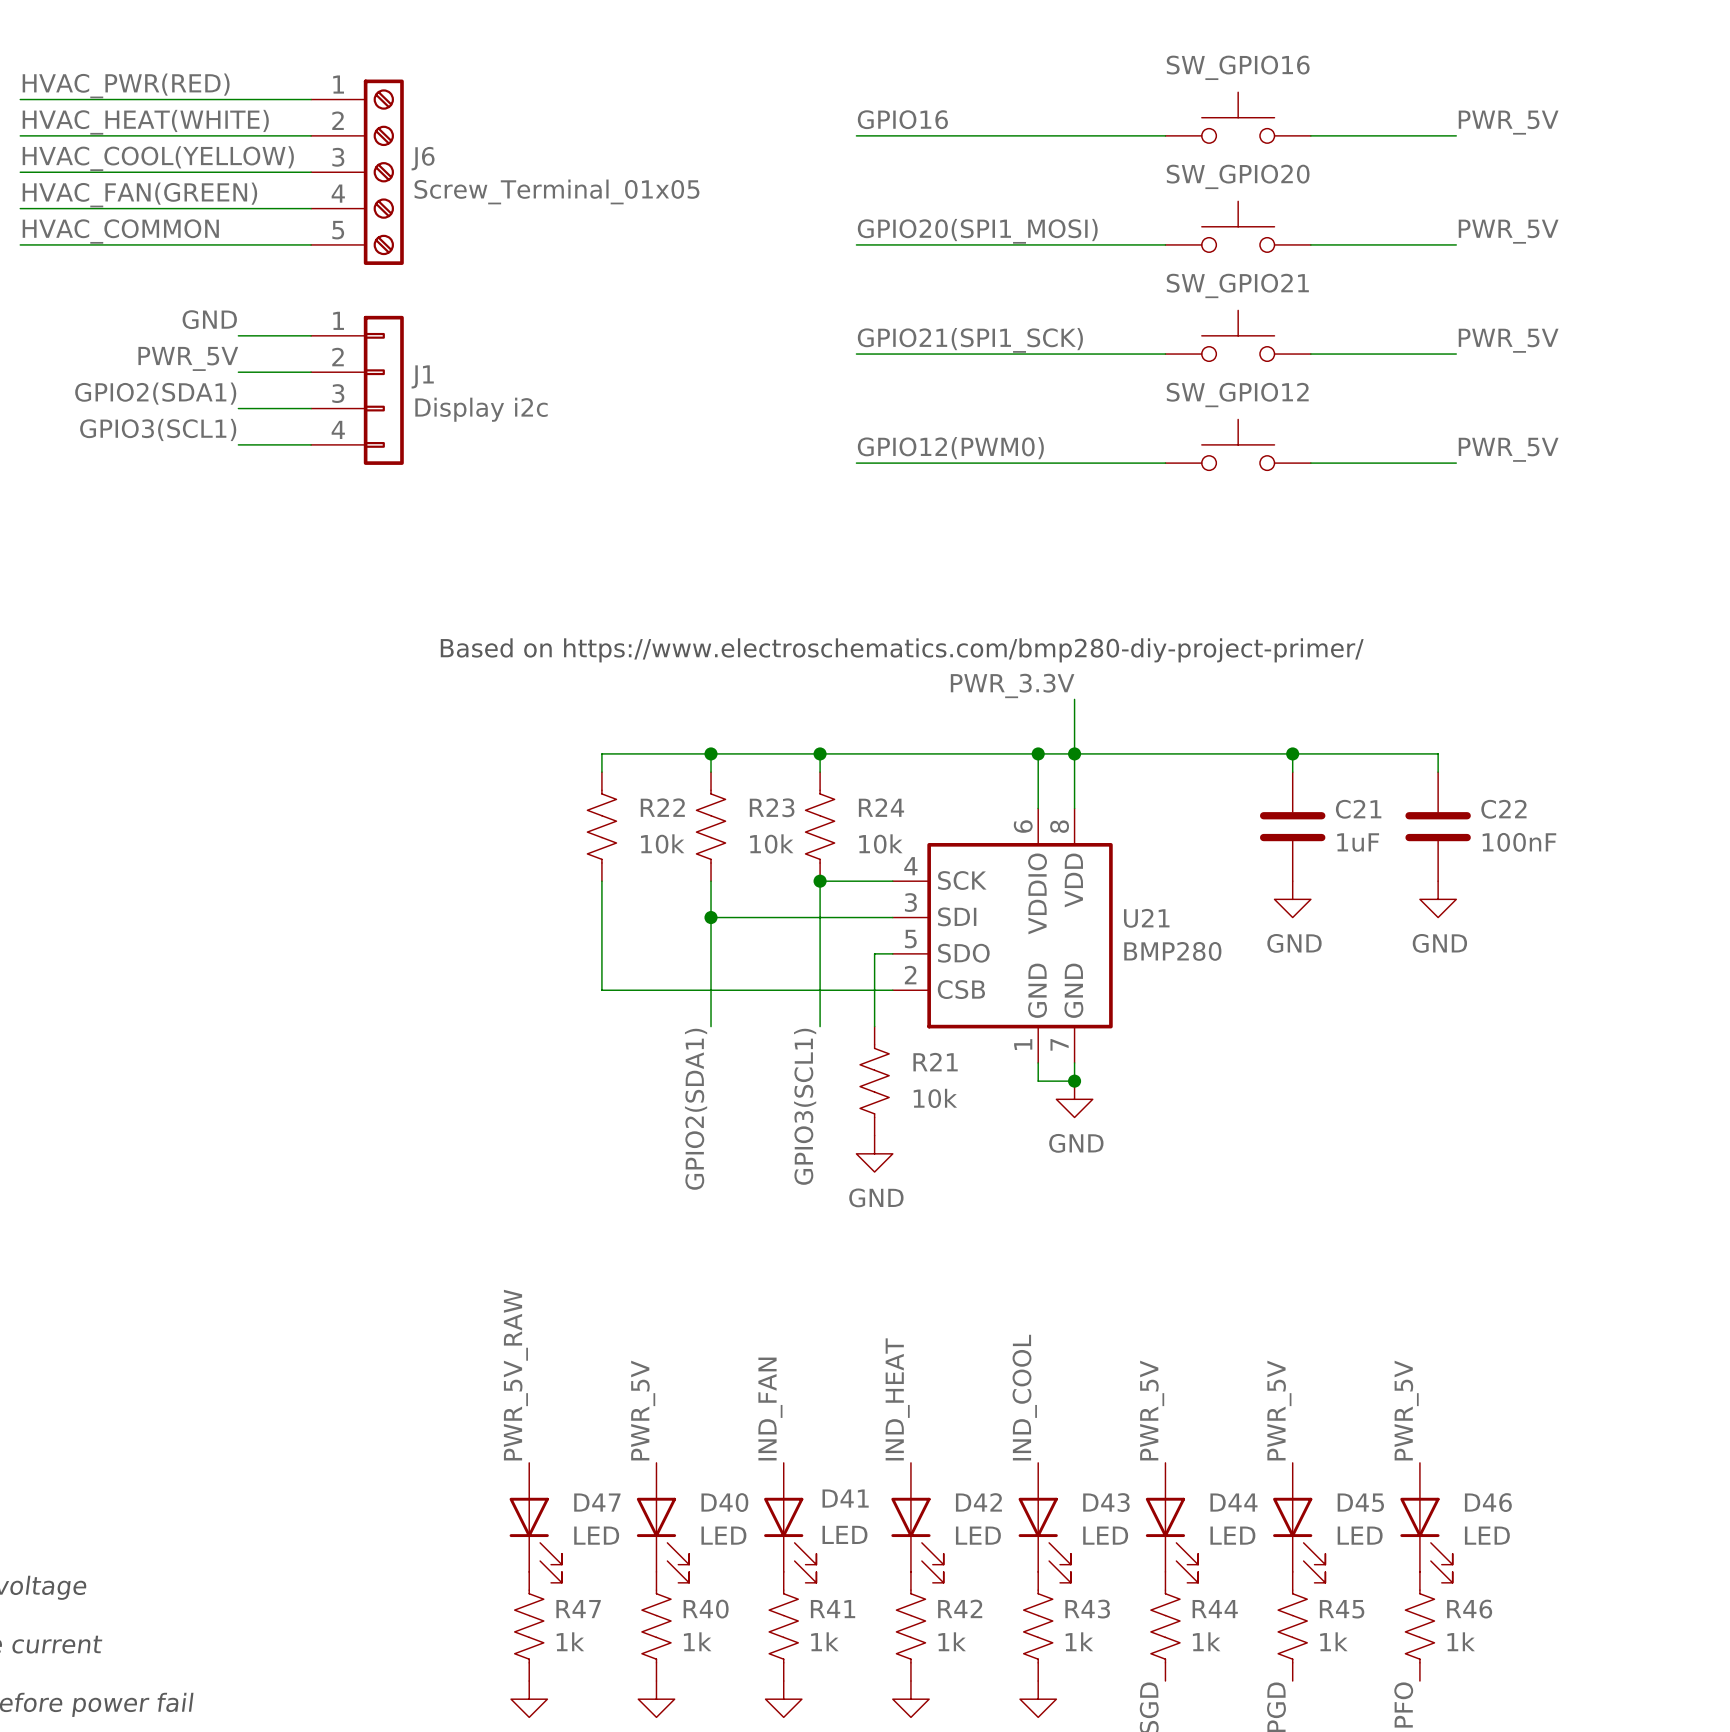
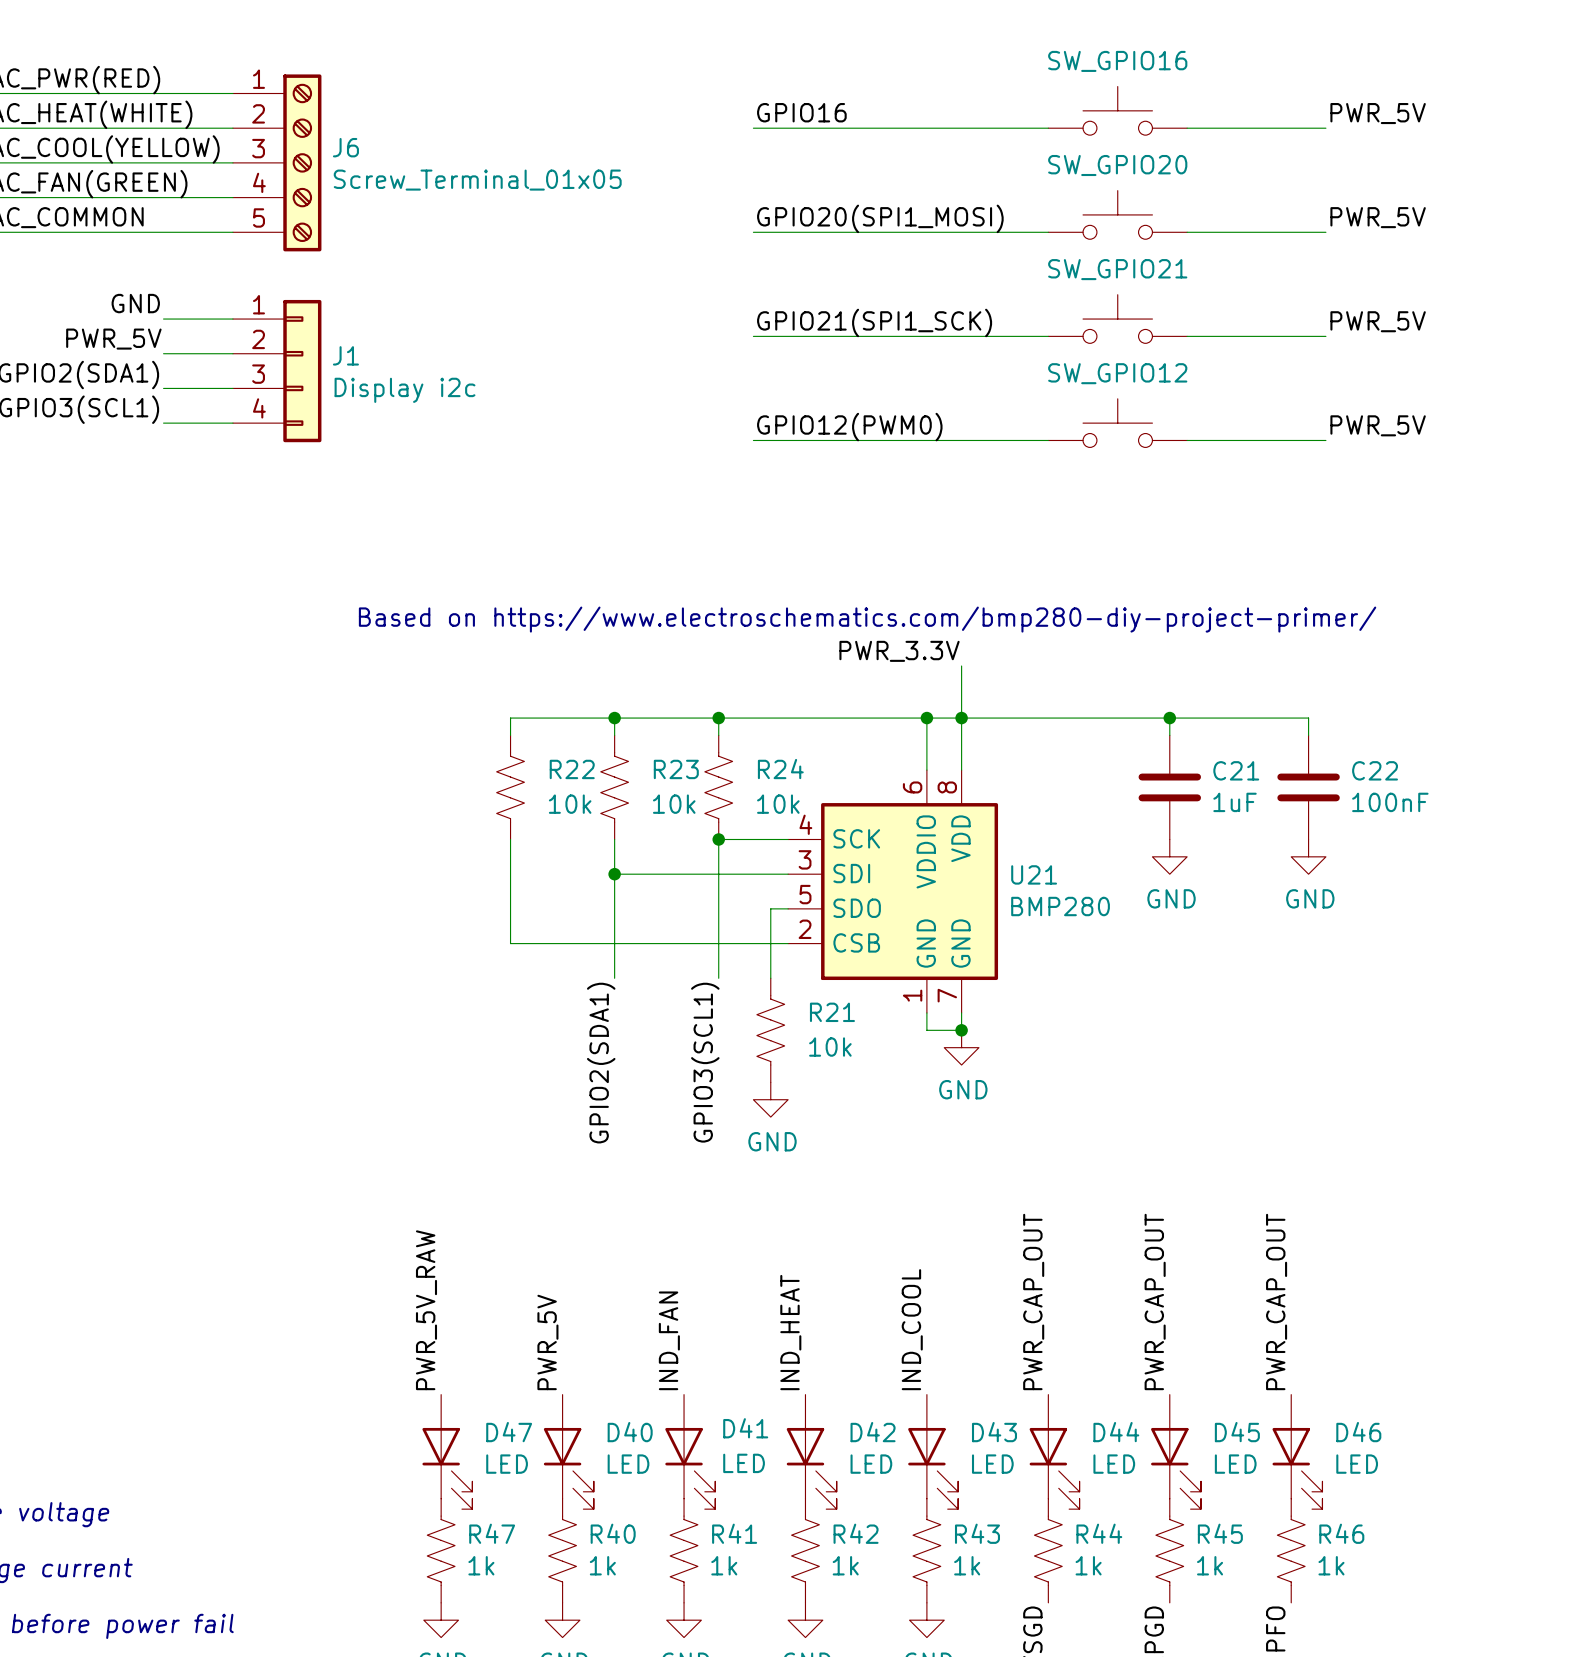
label: PWR_5V (1152, 1410) -> PWR_CAP_OUT (1033, 1301)
label: PWR_5V (1279, 1410) -> PWR_CAP_OUT (1155, 1301)
label: PWR_5V (1406, 1410) -> PWR_CAP_OUT (1276, 1301)

